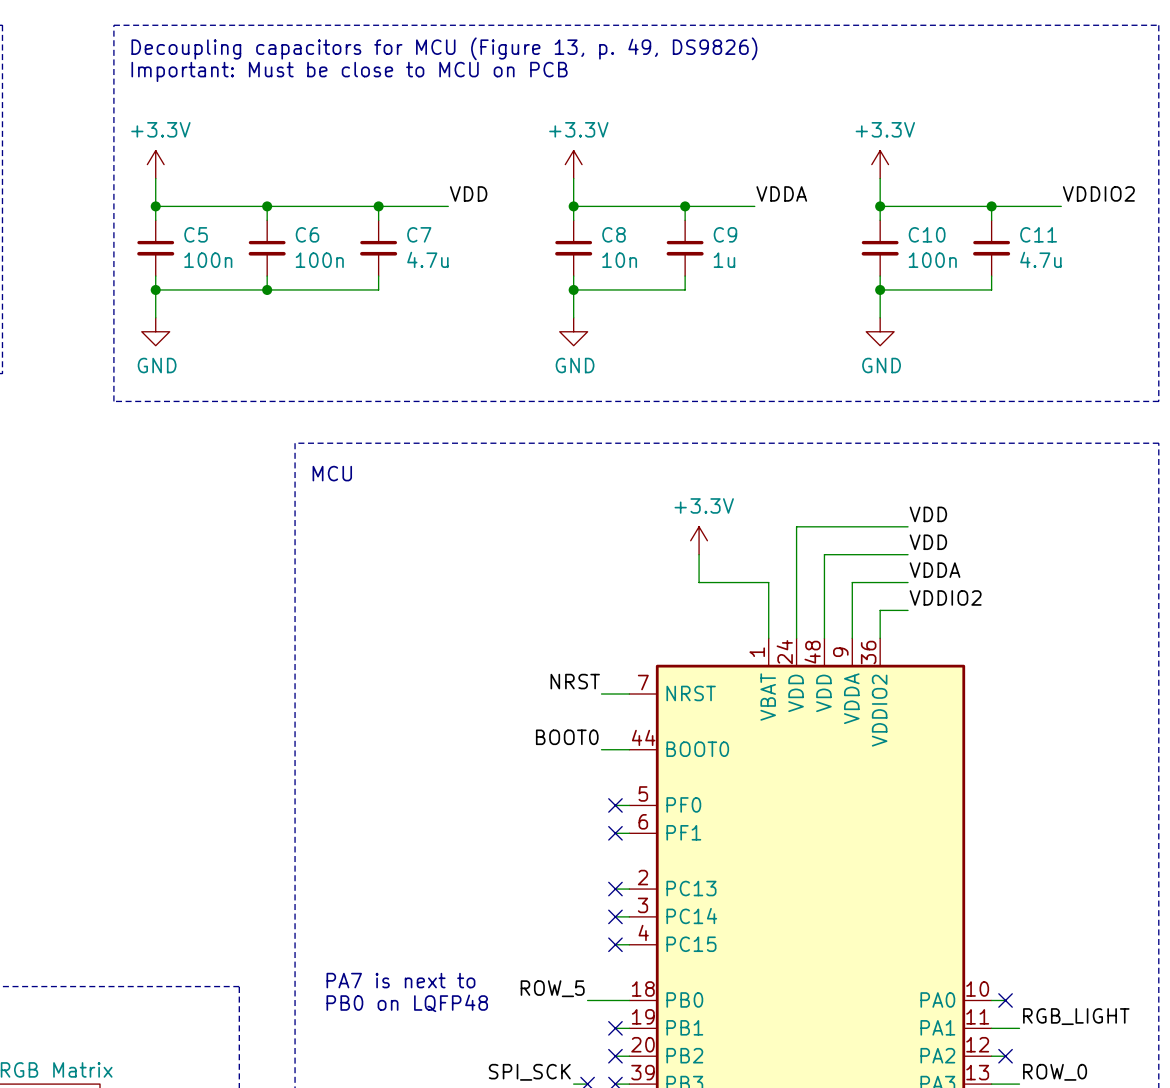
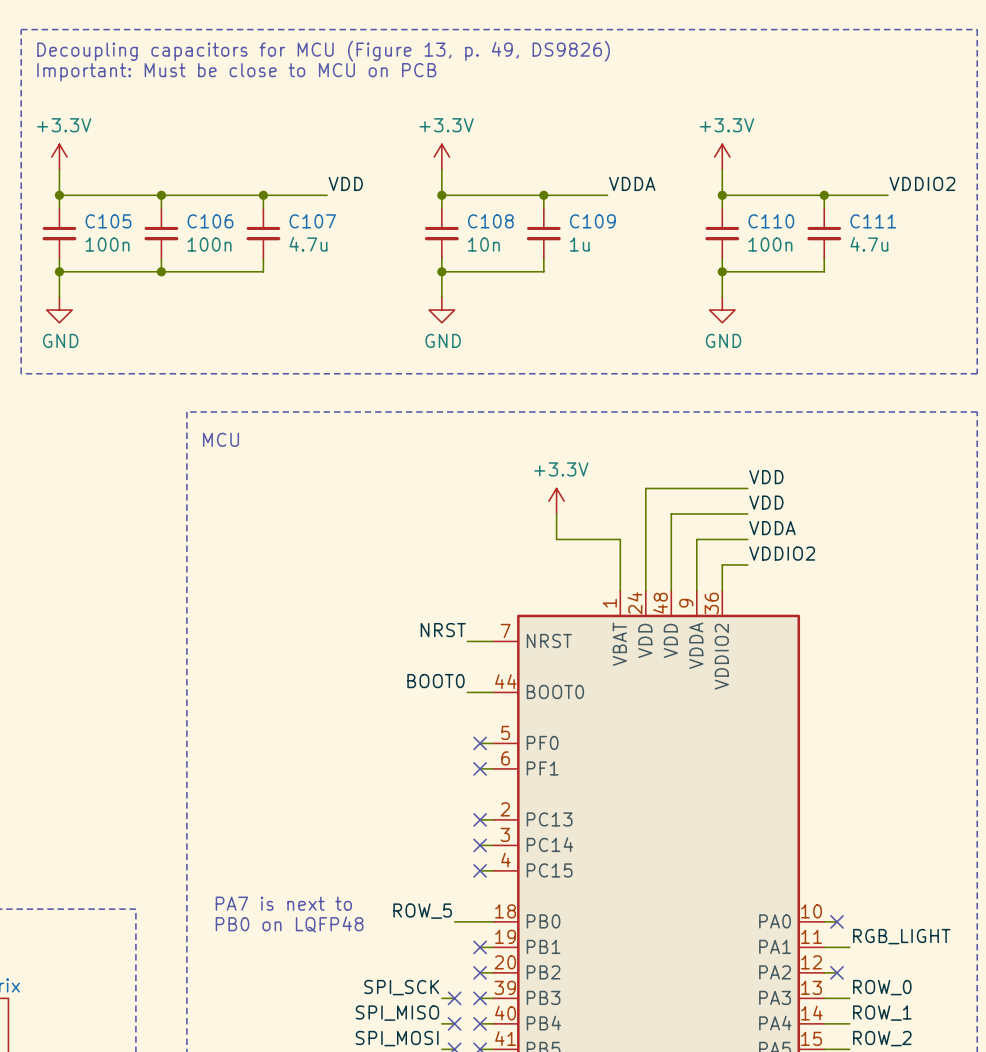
C5 name: C5 (196, 234) -> C105 (108, 221)
C6 name: C6 (307, 234) -> C106 (210, 221)
C7 name: C7 (419, 234) -> C107 (312, 221)
C8 name: C8 (614, 234) -> C108 (490, 221)
C9 name: C9 (725, 234) -> C109 (592, 221)
C10 name: C10 (927, 234) -> C110 (771, 221)
C11 name: C11 (1038, 234) -> C111 (873, 221)

